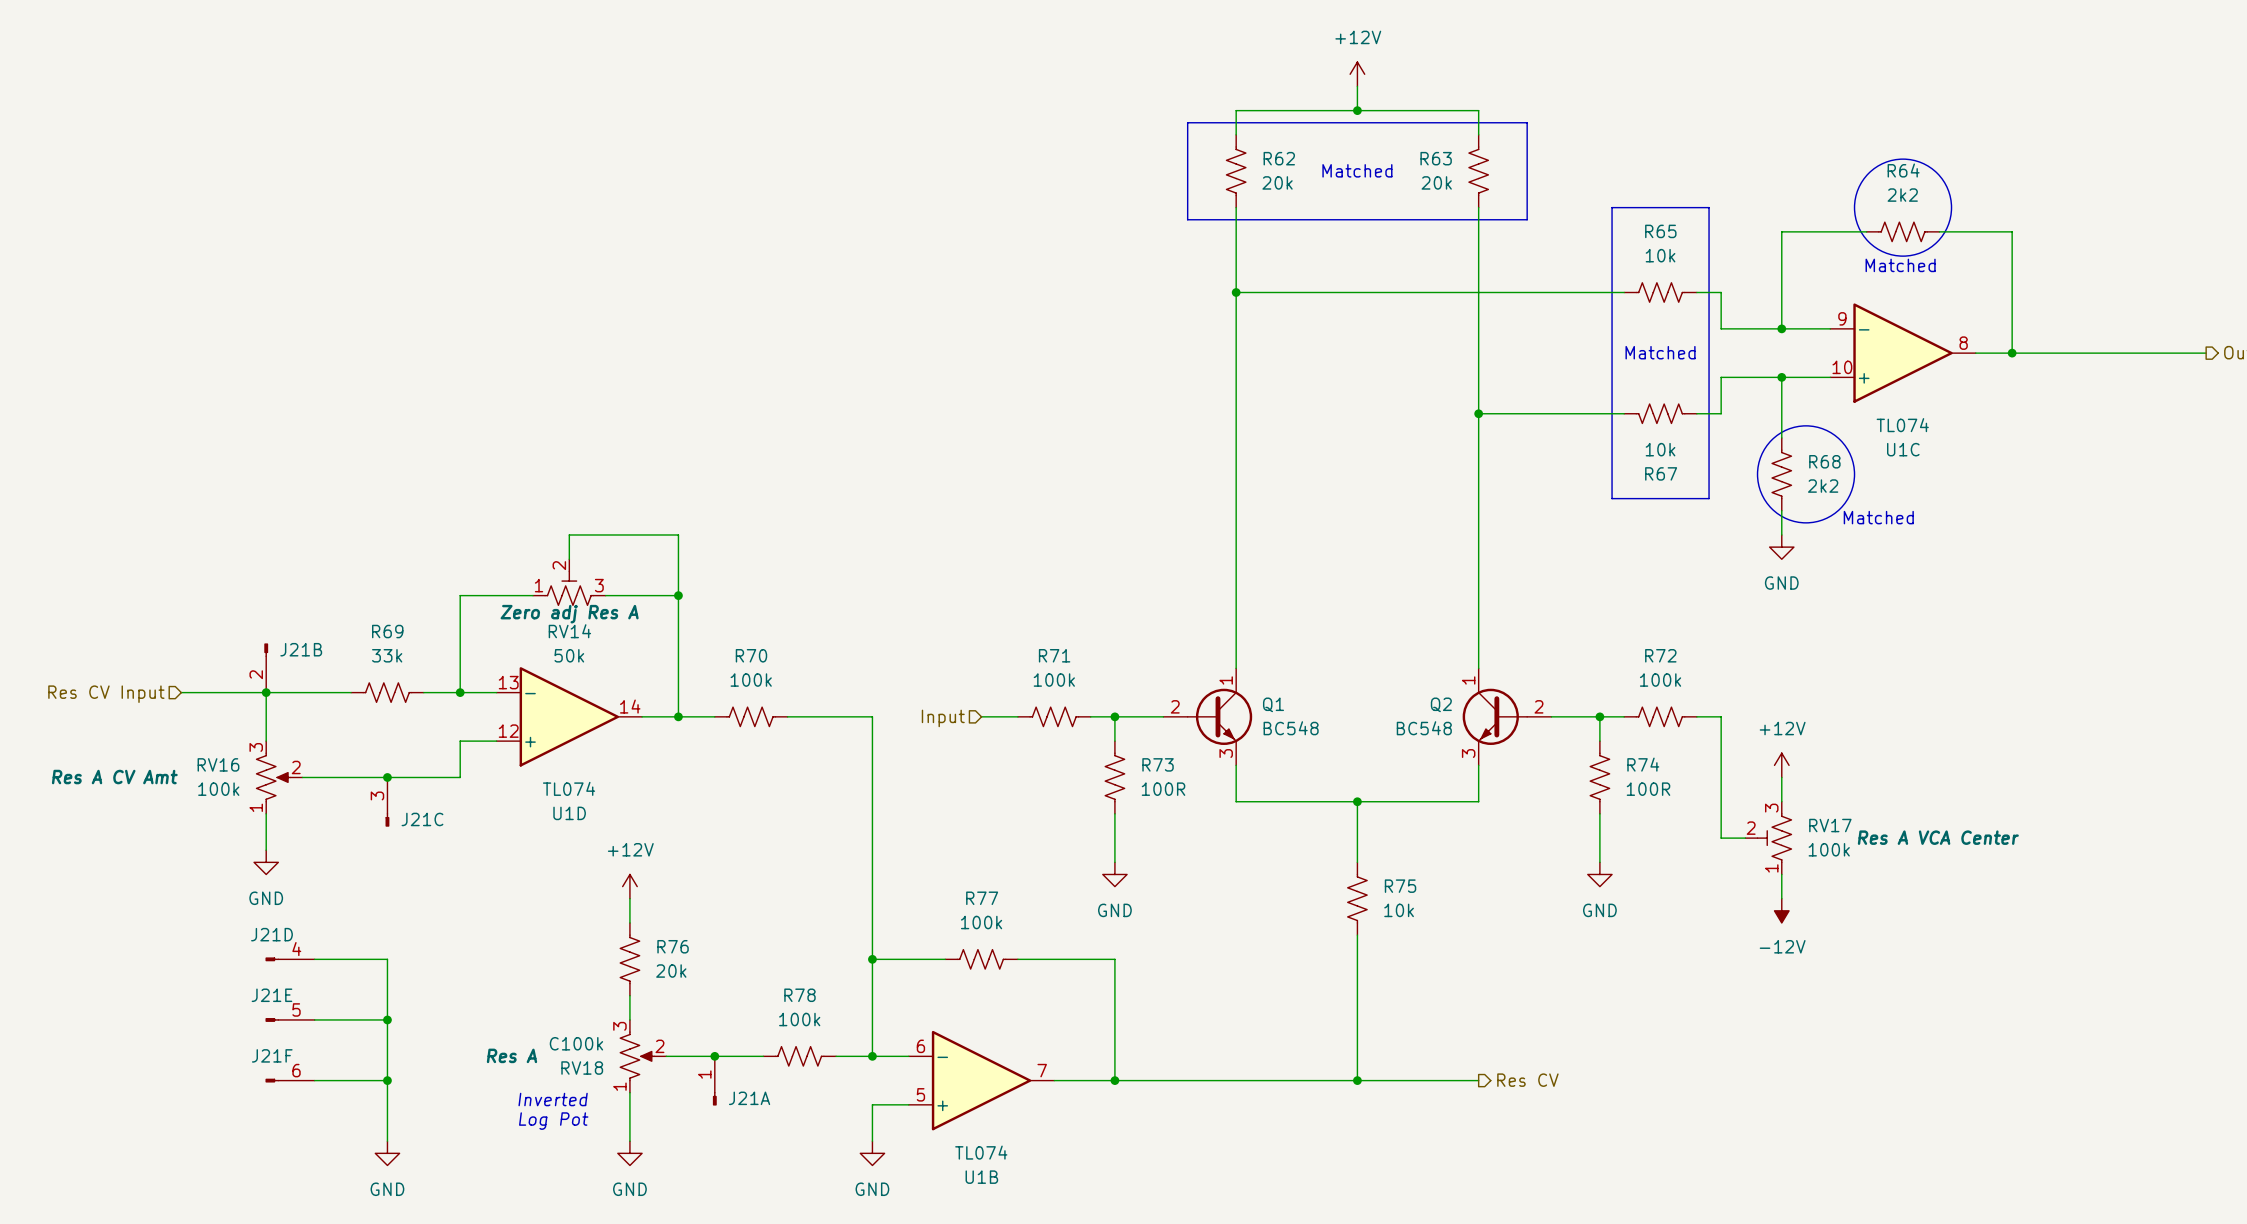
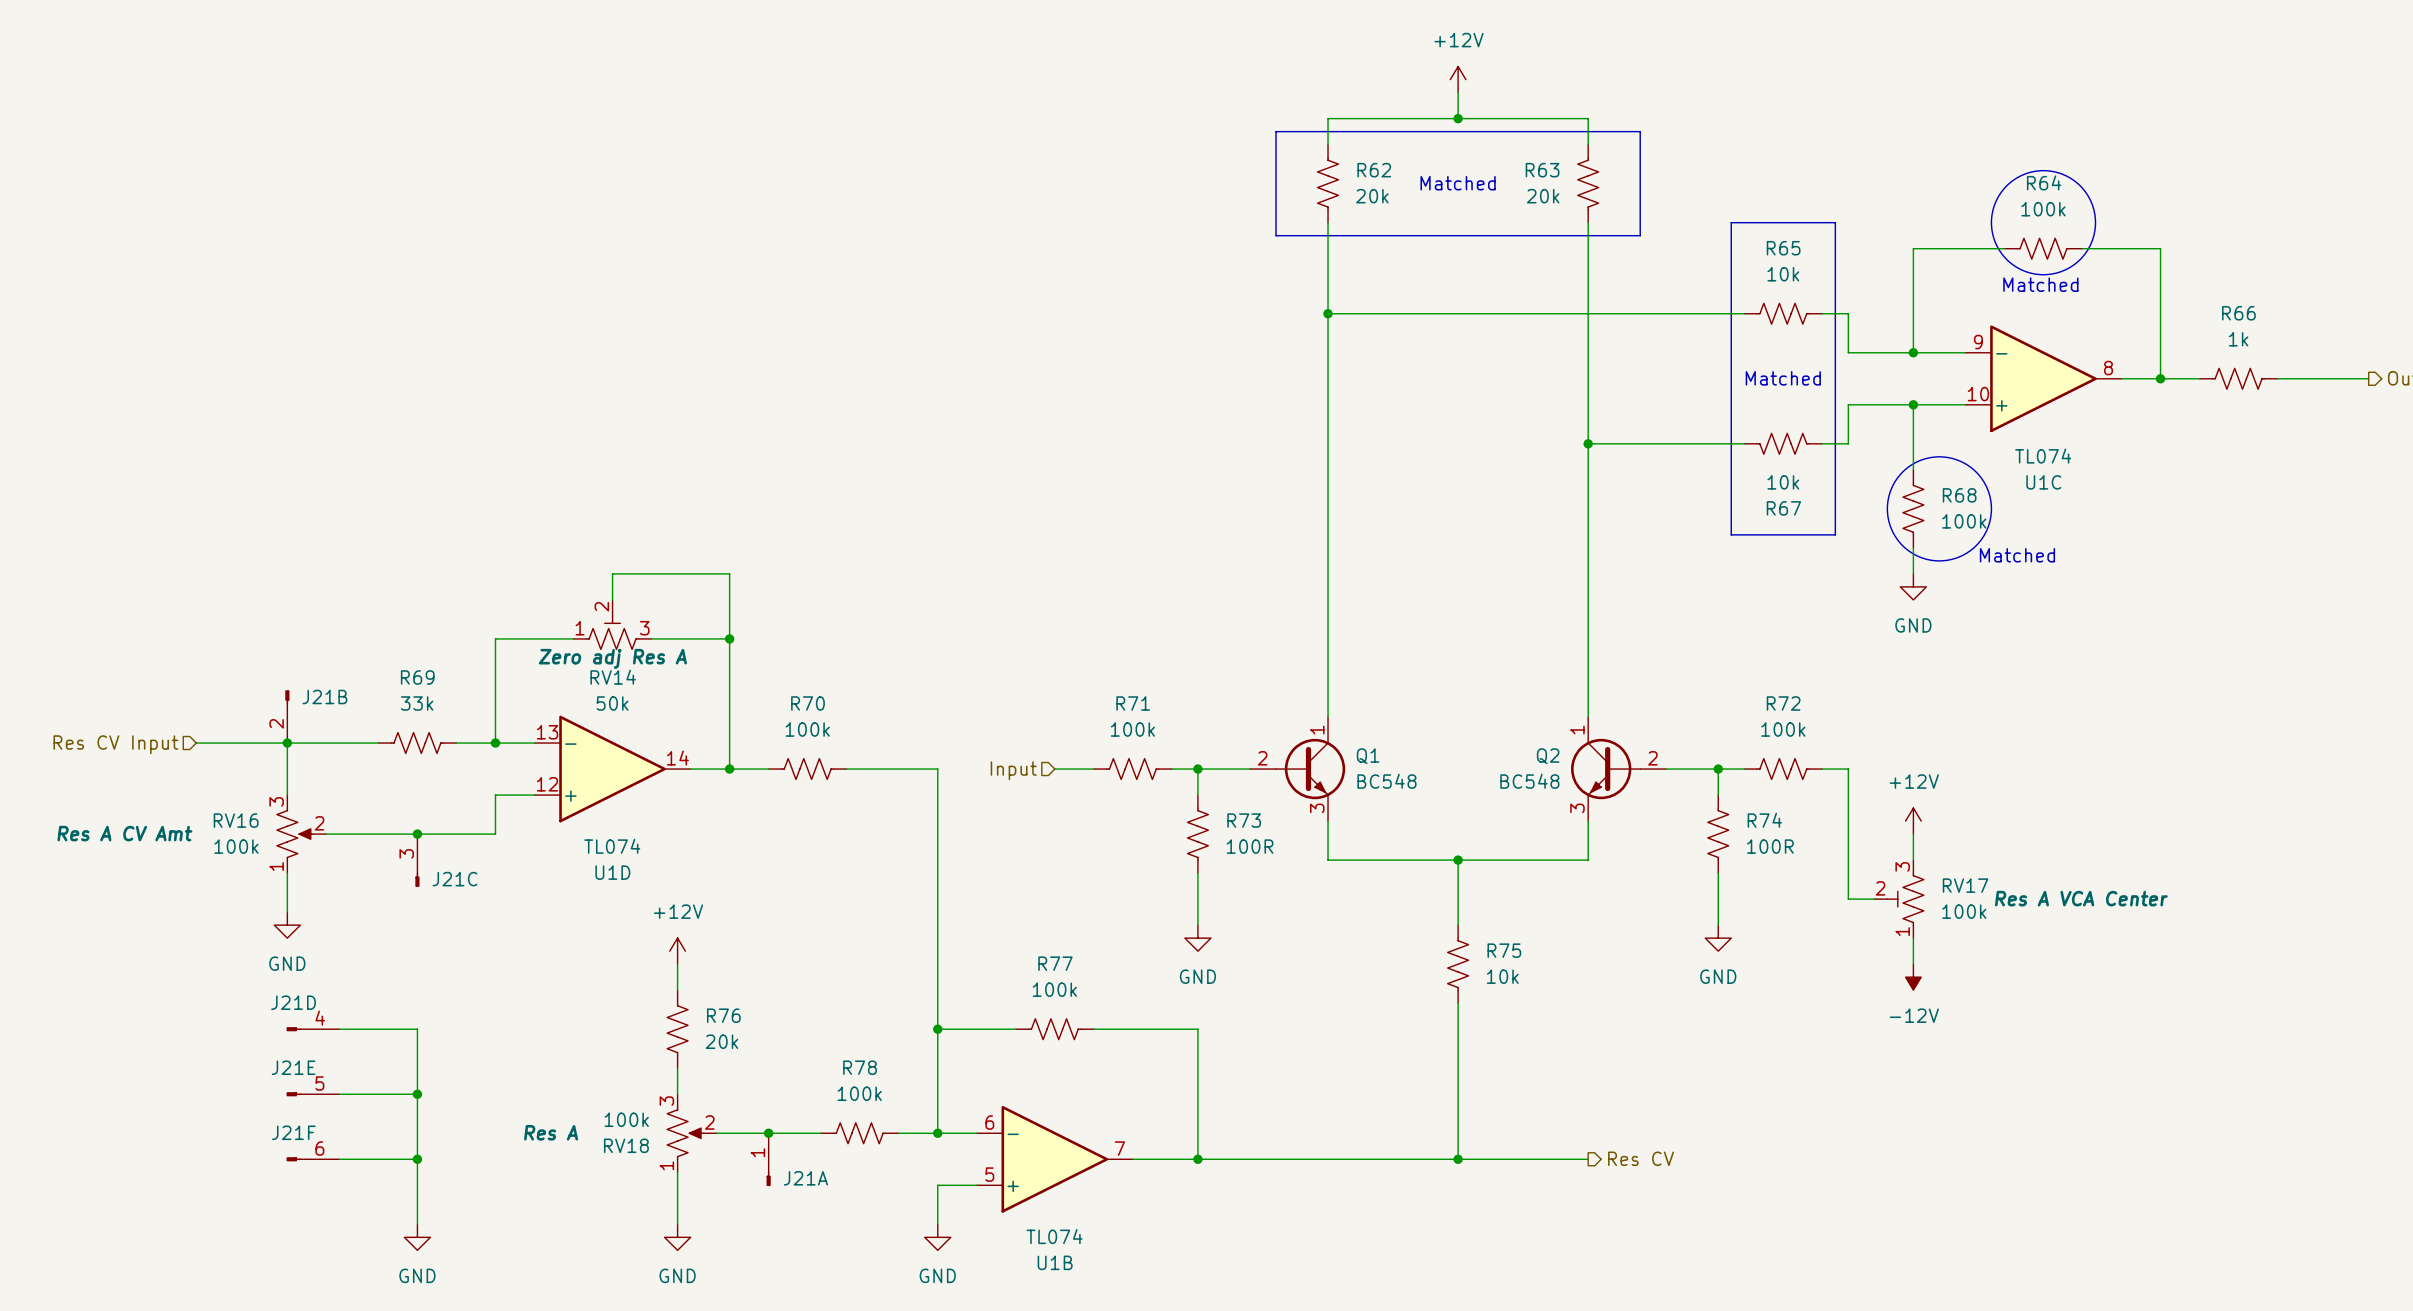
R64 value: 2k2 (1902, 195) -> 100k (2043, 209)
R66: none -> 1k (2238, 378)
R68 value: 2k2 (1823, 486) -> 100k (1964, 521)
RV18 value: C100k (576, 1043) -> 100k (626, 1119)
text: Inverted (553, 1099) -> none
text: Log Pot (553, 1121) -> none

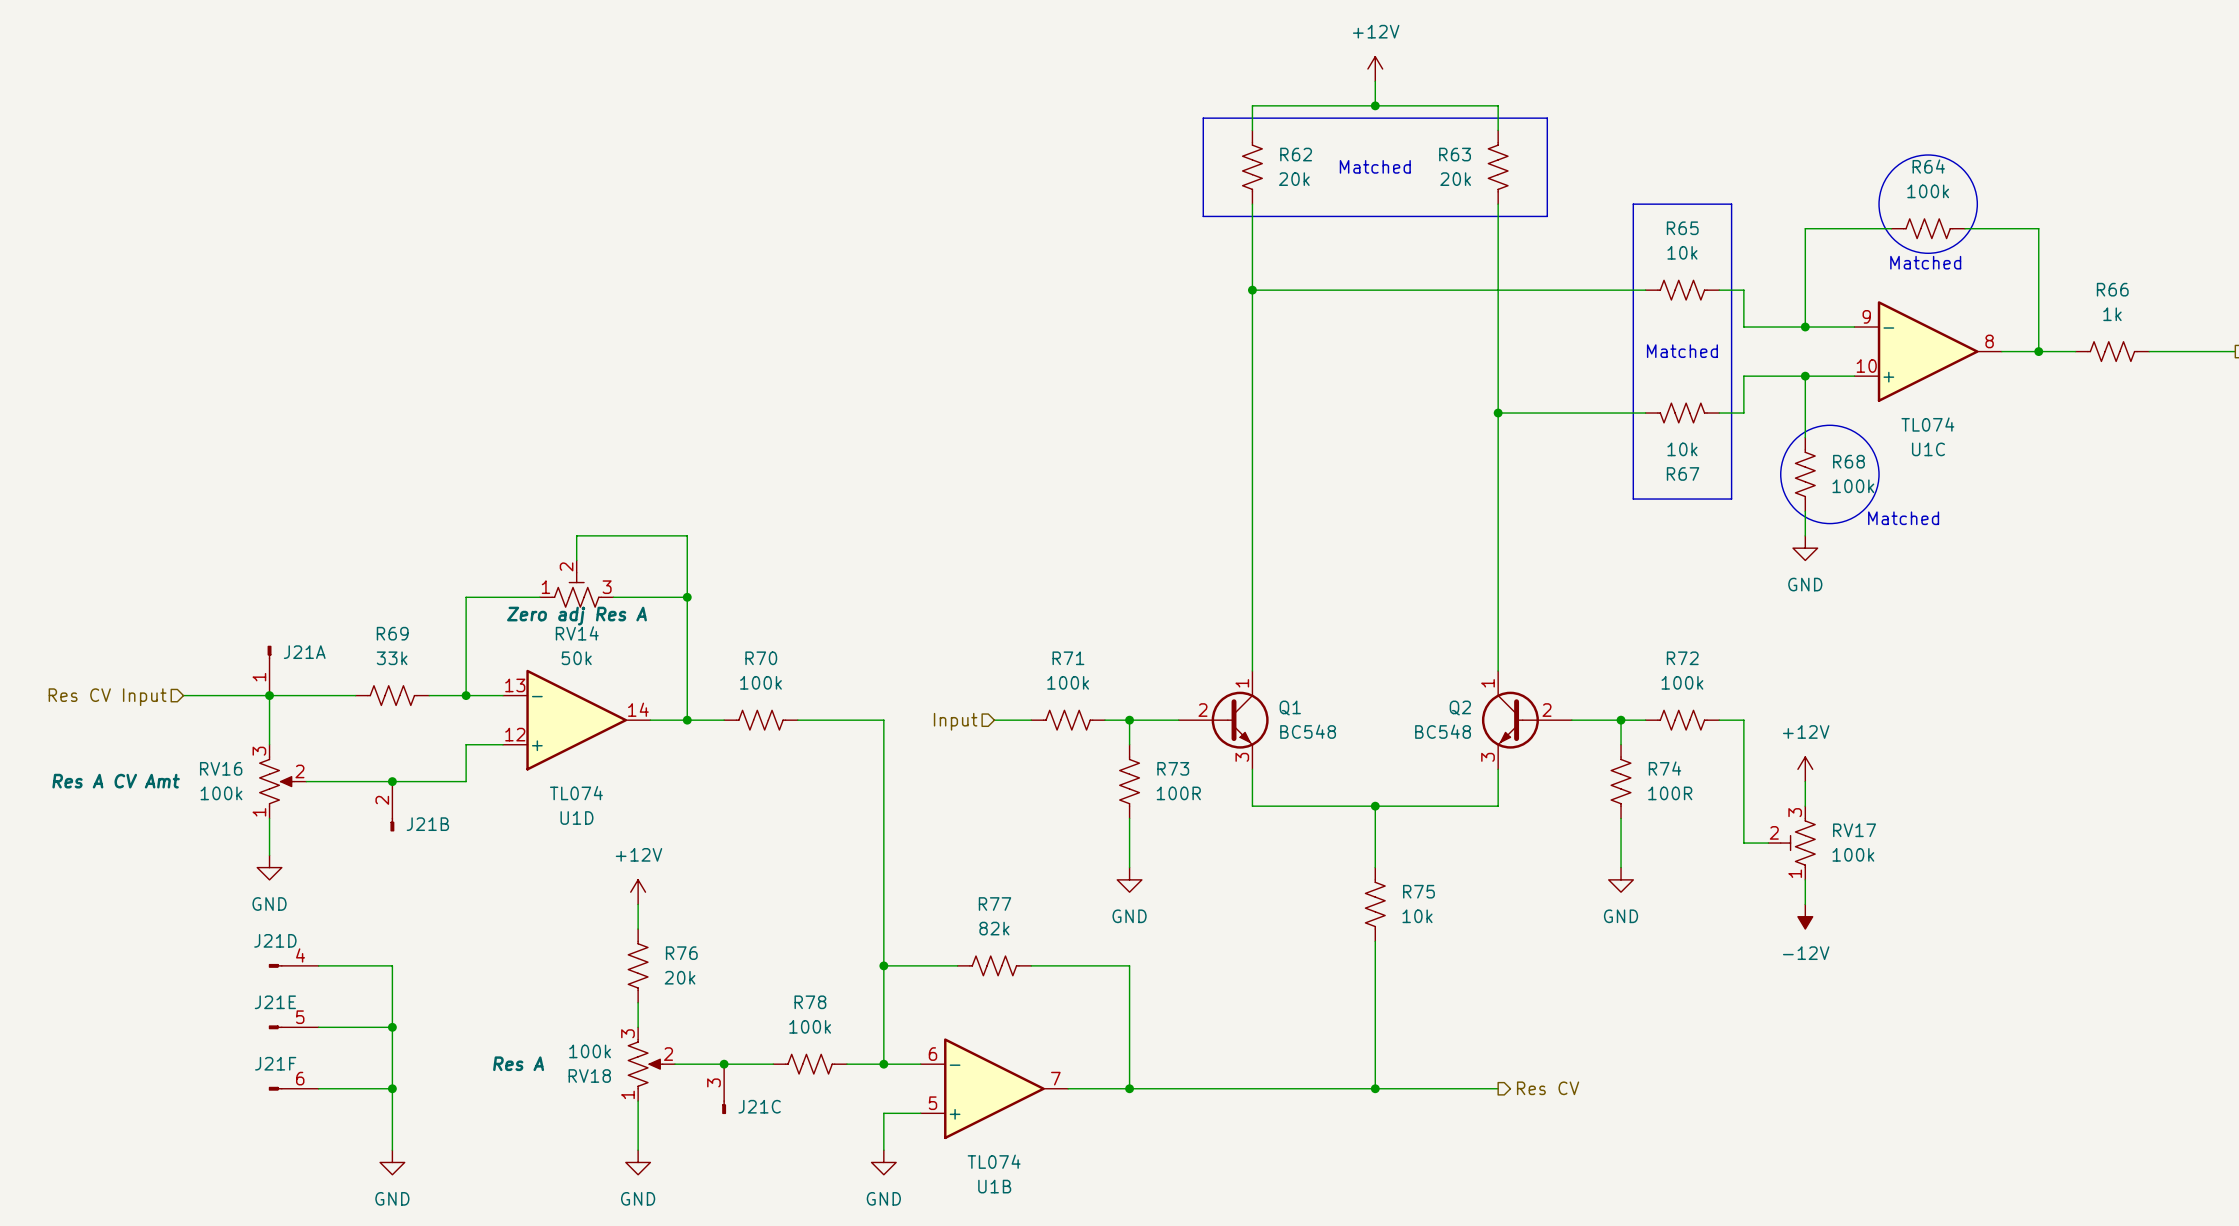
J21B rotation: 0° (287, 697) -> 180° (392, 824)
J21B name position: J21B (324, 697) -> J21B (427, 824)
J21B position: (287, 716) -> (392, 806)
Q1 symbol: [1249, 717, 1346, 822] -> [1178, 671, 1269, 770]
Q2 symbol: [1571, 717, 1667, 822] -> [1481, 671, 1572, 770]
J21C position: (417, 860) -> (724, 1089)
RV17 text: Res A VCA Center (2081, 898) -> none
R77 value: 100k (1054, 989) -> 82k (994, 928)
J21A position: (768, 1159) -> (269, 670)
J21A rotation: 0° (768, 1178) -> 180° (269, 652)
J21A name position: J21A (805, 1178) -> J21A (304, 652)

